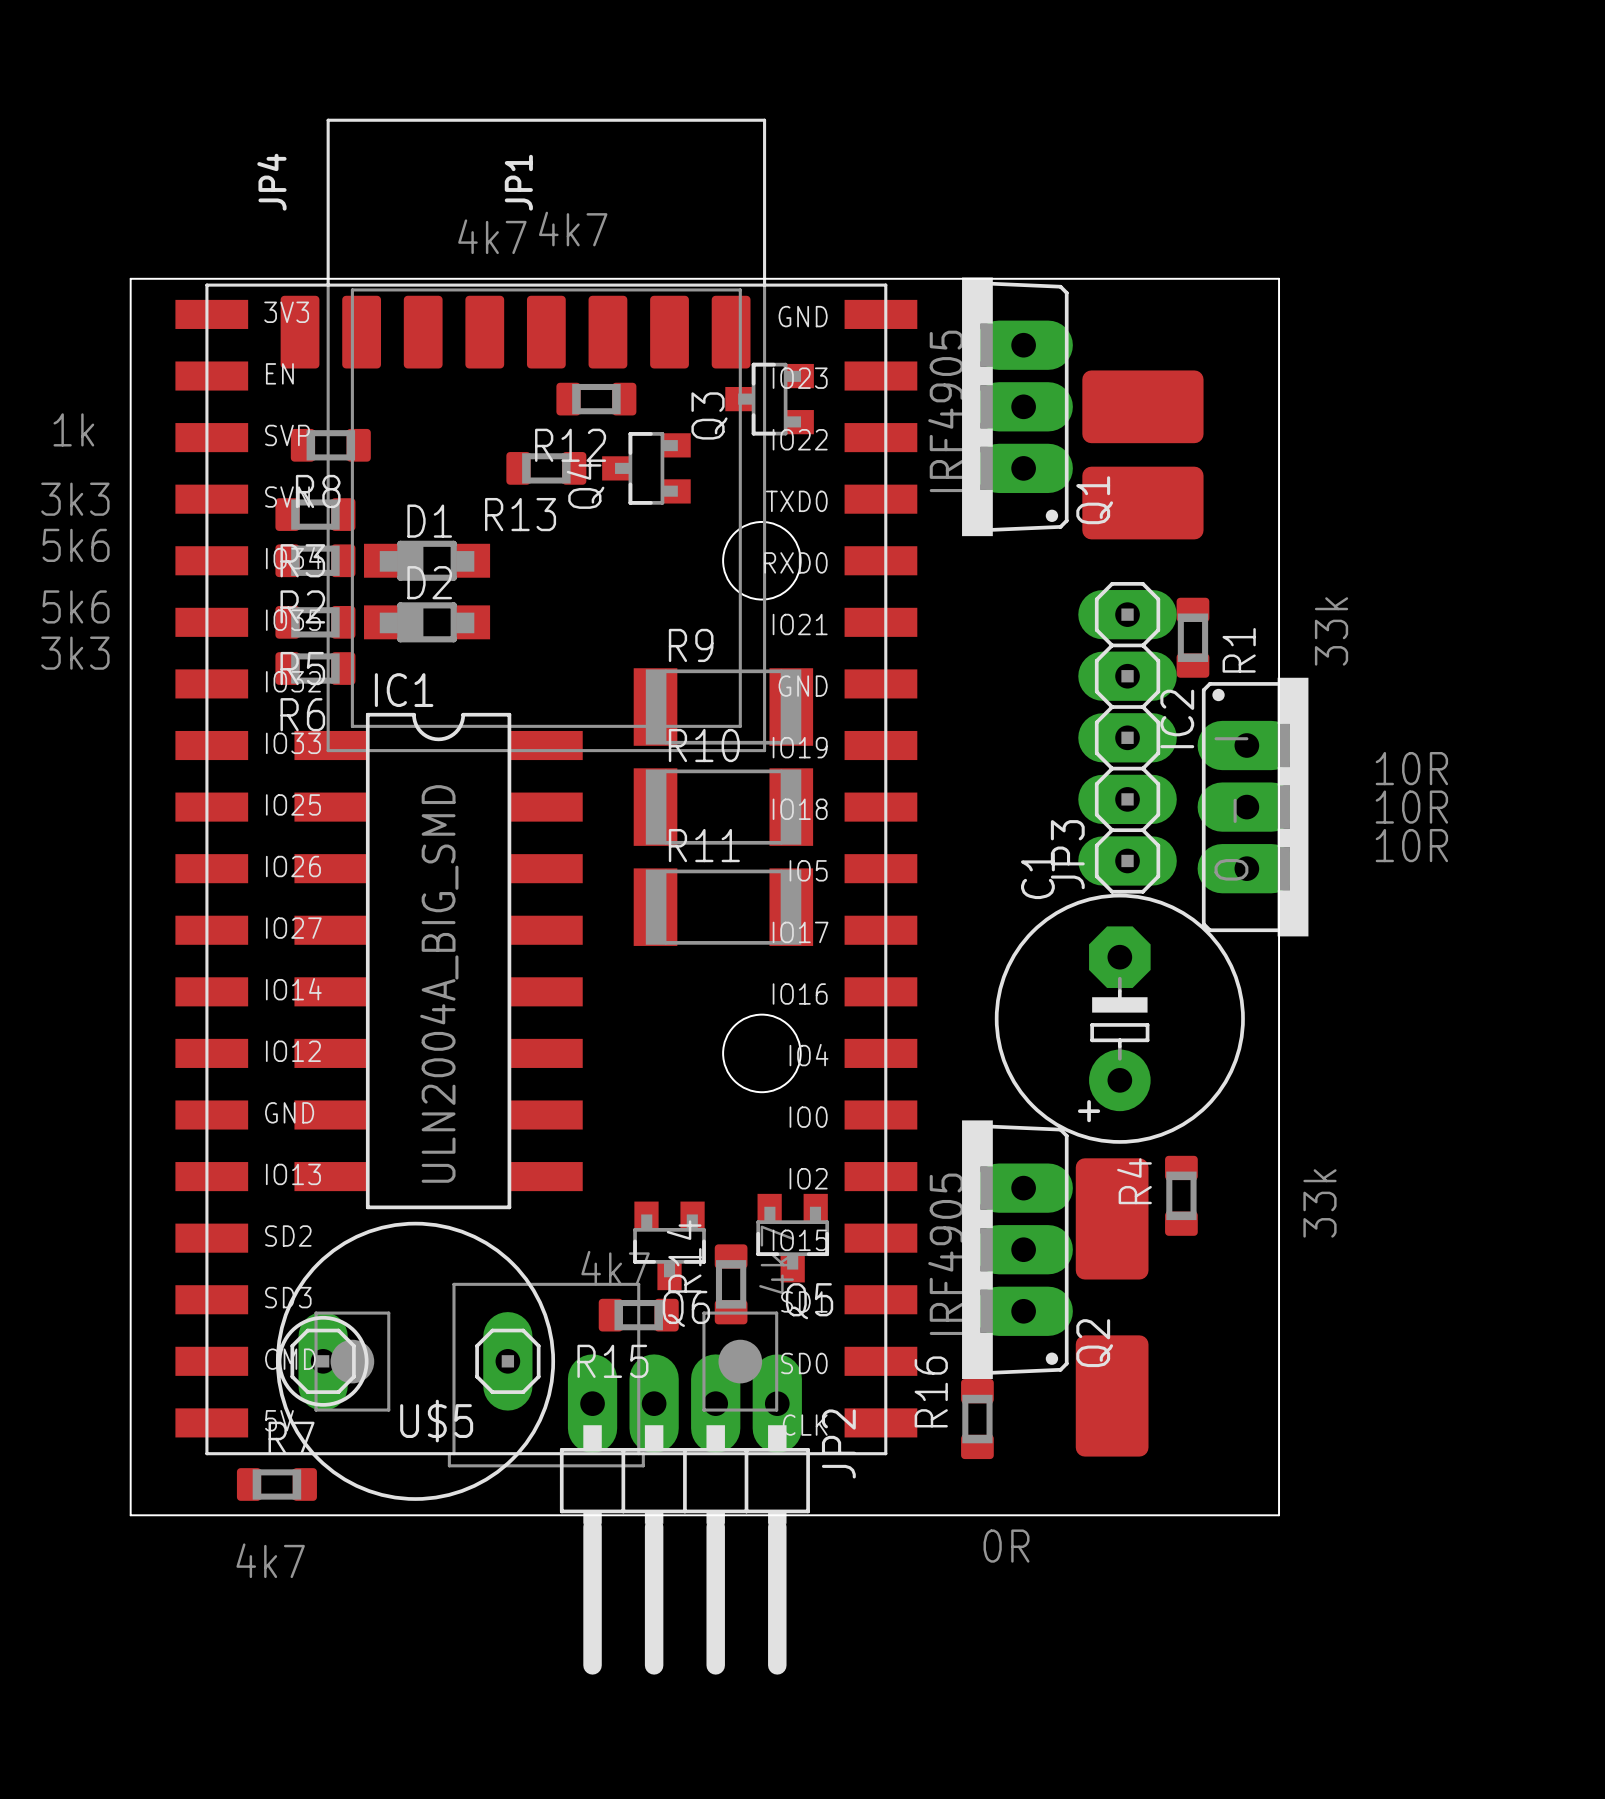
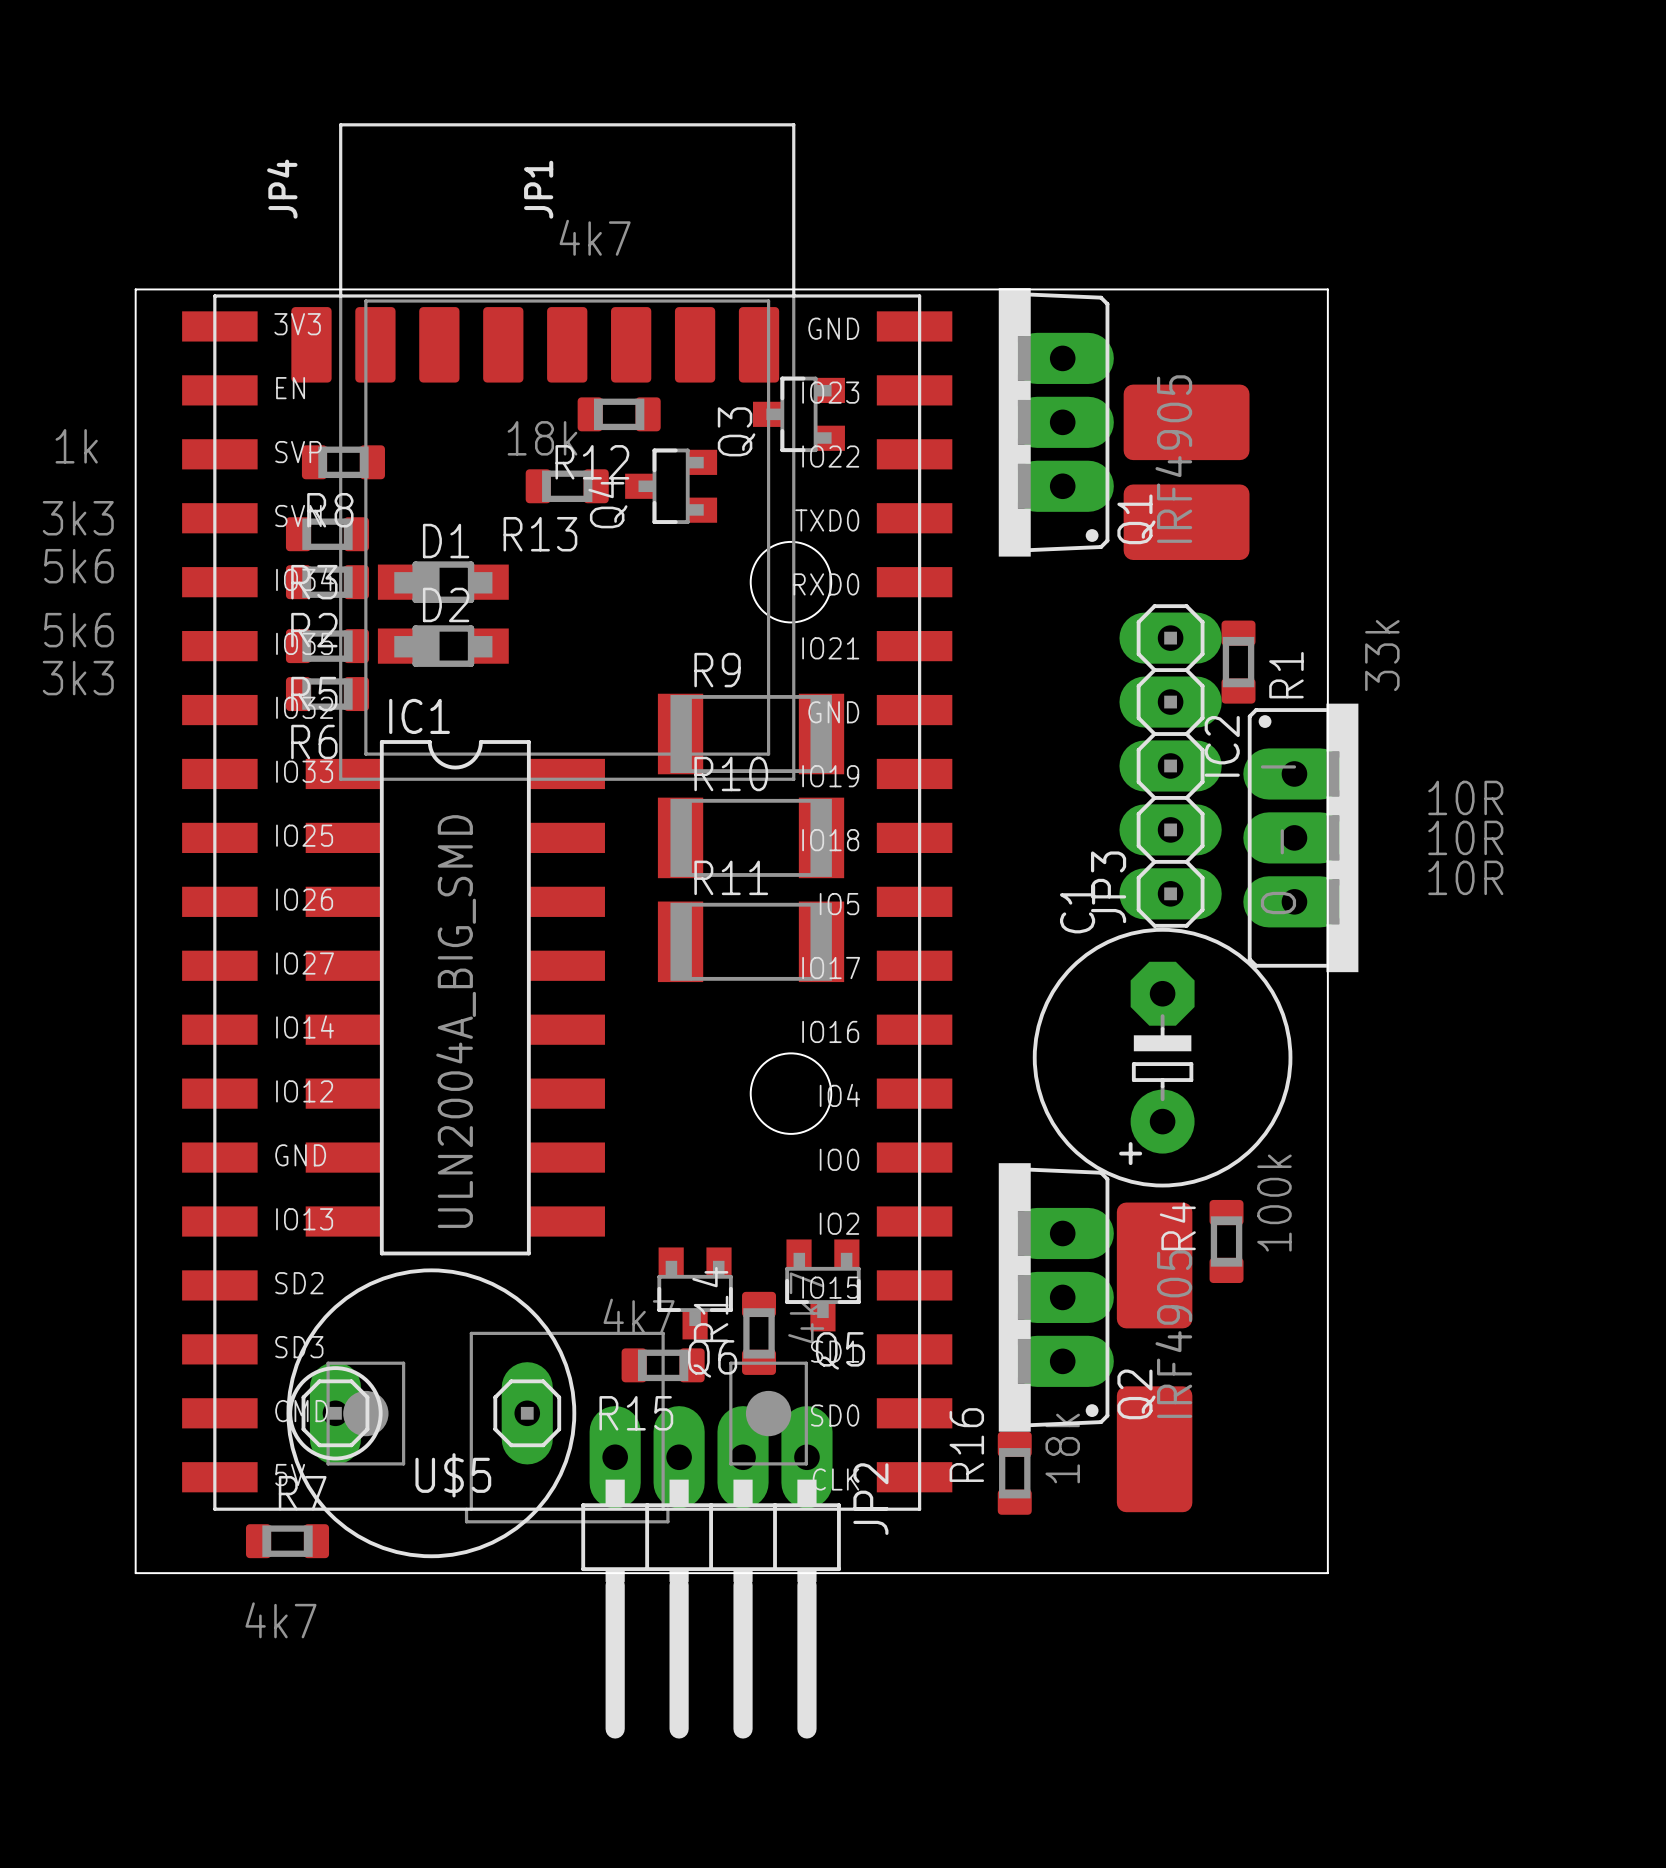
R13 value: 4k7 (492, 236) -> 18k (542, 438)
Q1 value position: IRF4905 (945, 411) -> IRF4905 (1173, 459)
R4 value: 33k (1319, 1203) -> 100k (1274, 1203)
Q2 value position: IRF4905 (945, 1254) -> IRF4905 (1173, 1334)
R16 value: 0R (1006, 1546) -> 18k (1062, 1448)

